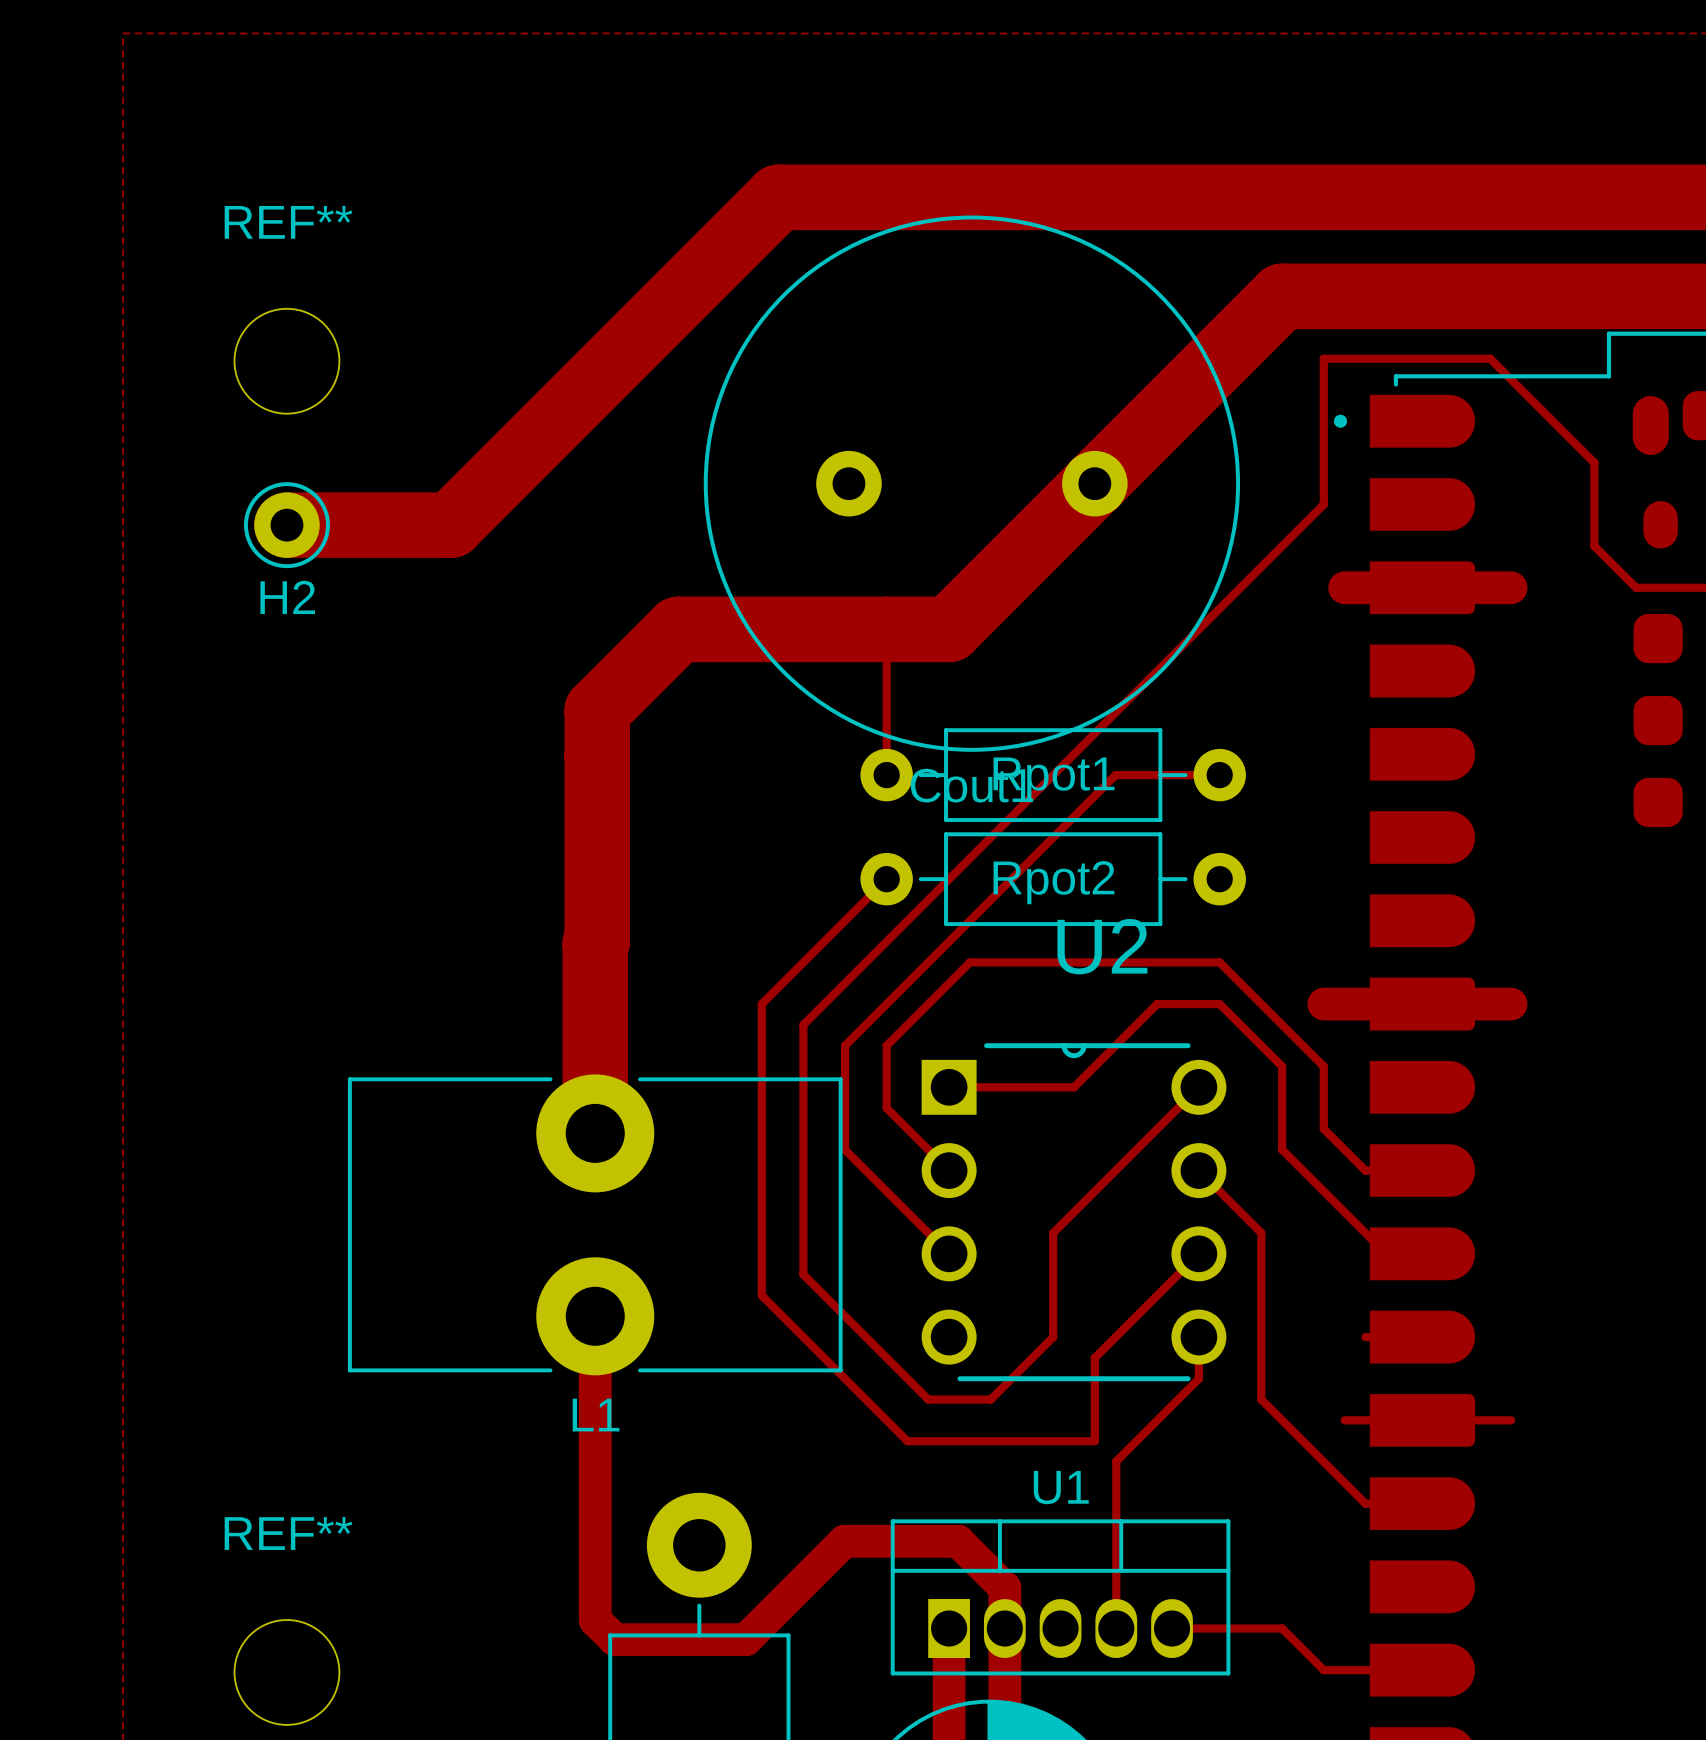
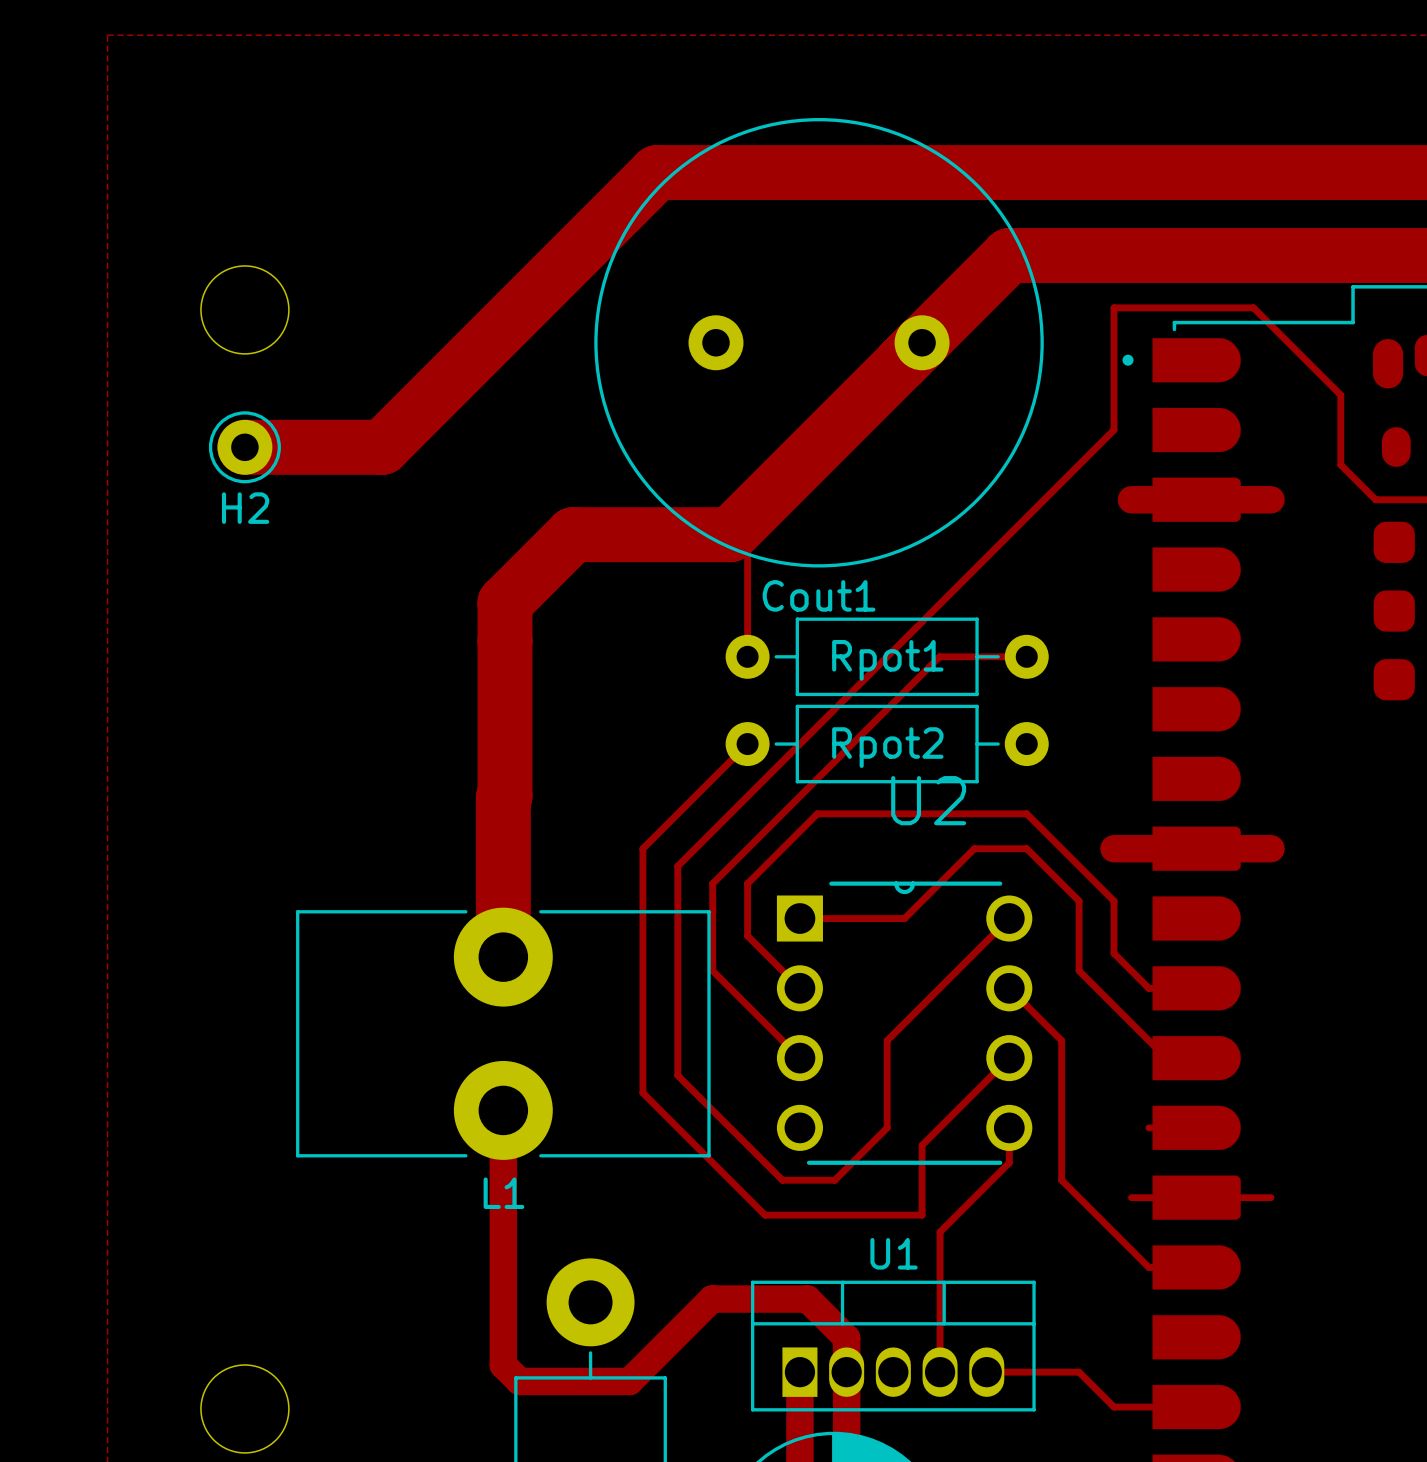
REF** name: REF** (288, 222) -> none
top track: (1282, 296) (949, 629) (865, 629) -> (1079, 255) (1009, 255) (730, 534)
Cout1 position: (971, 483) -> (819, 342)
REF** name: REF** (288, 1533) -> none

